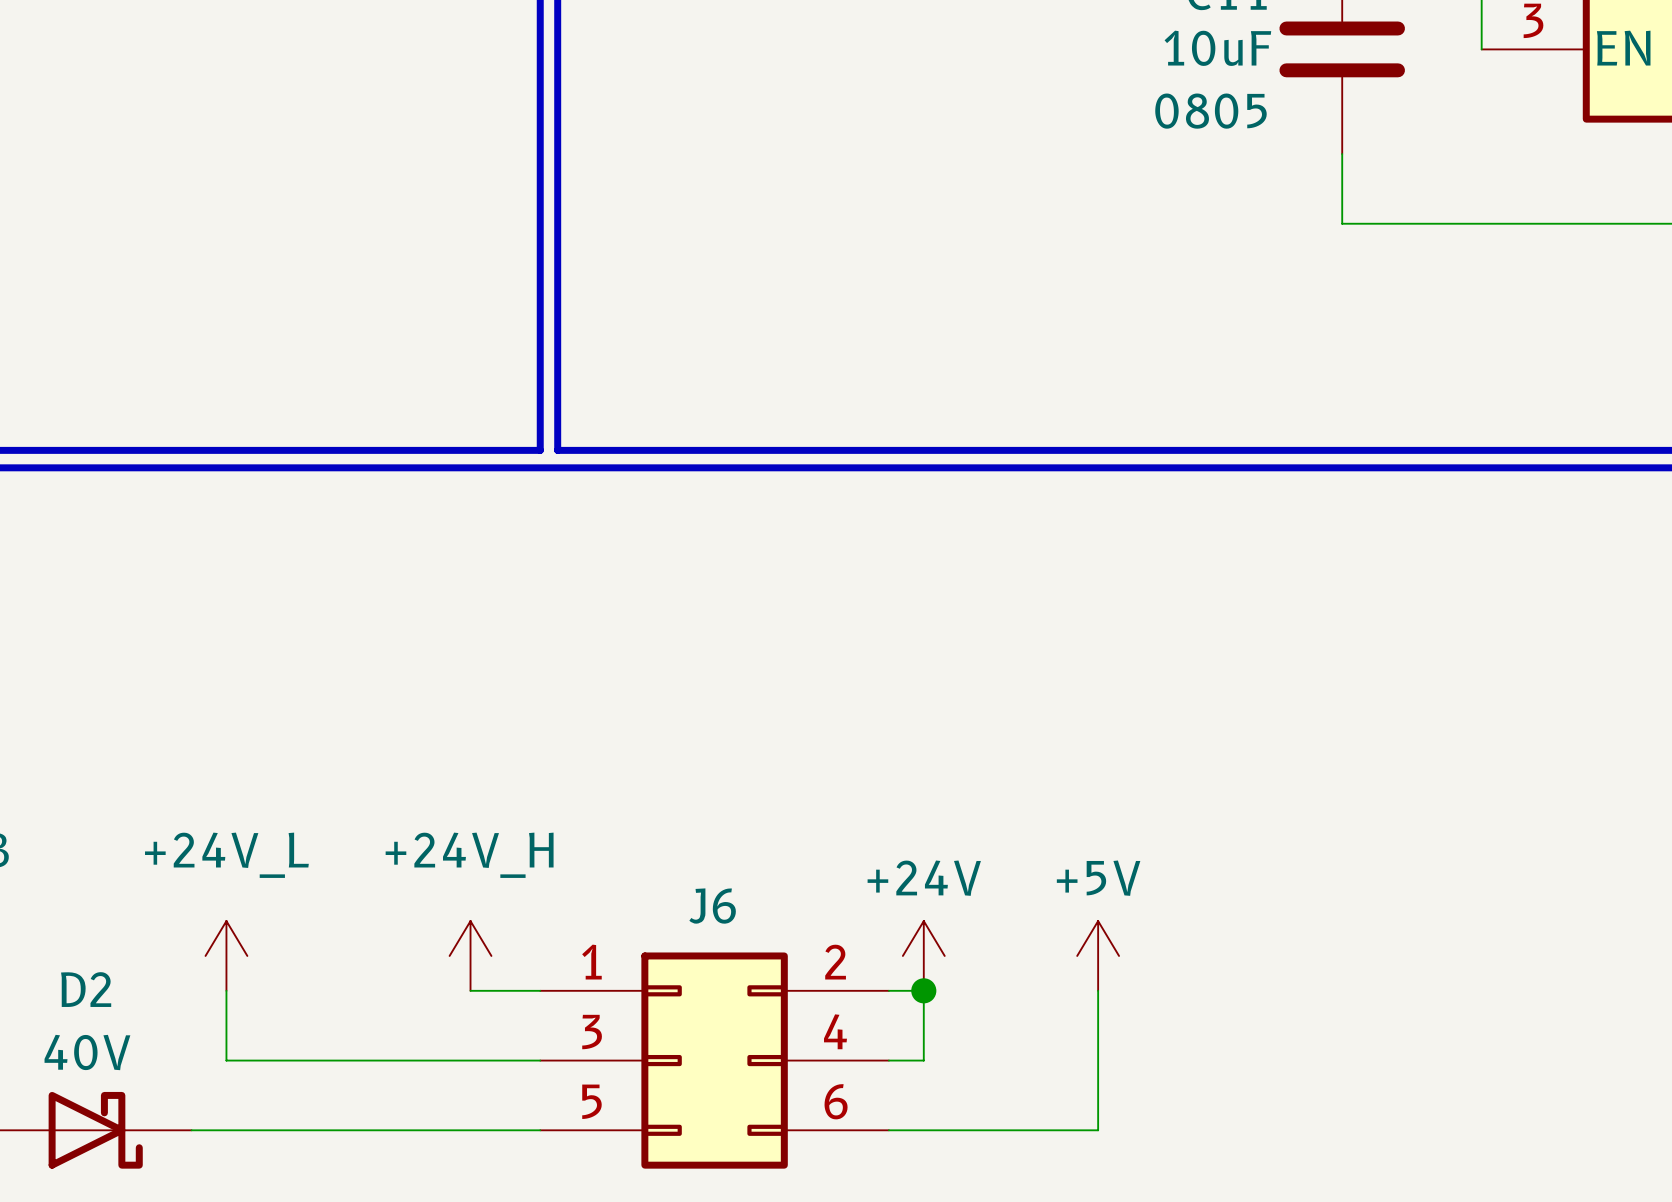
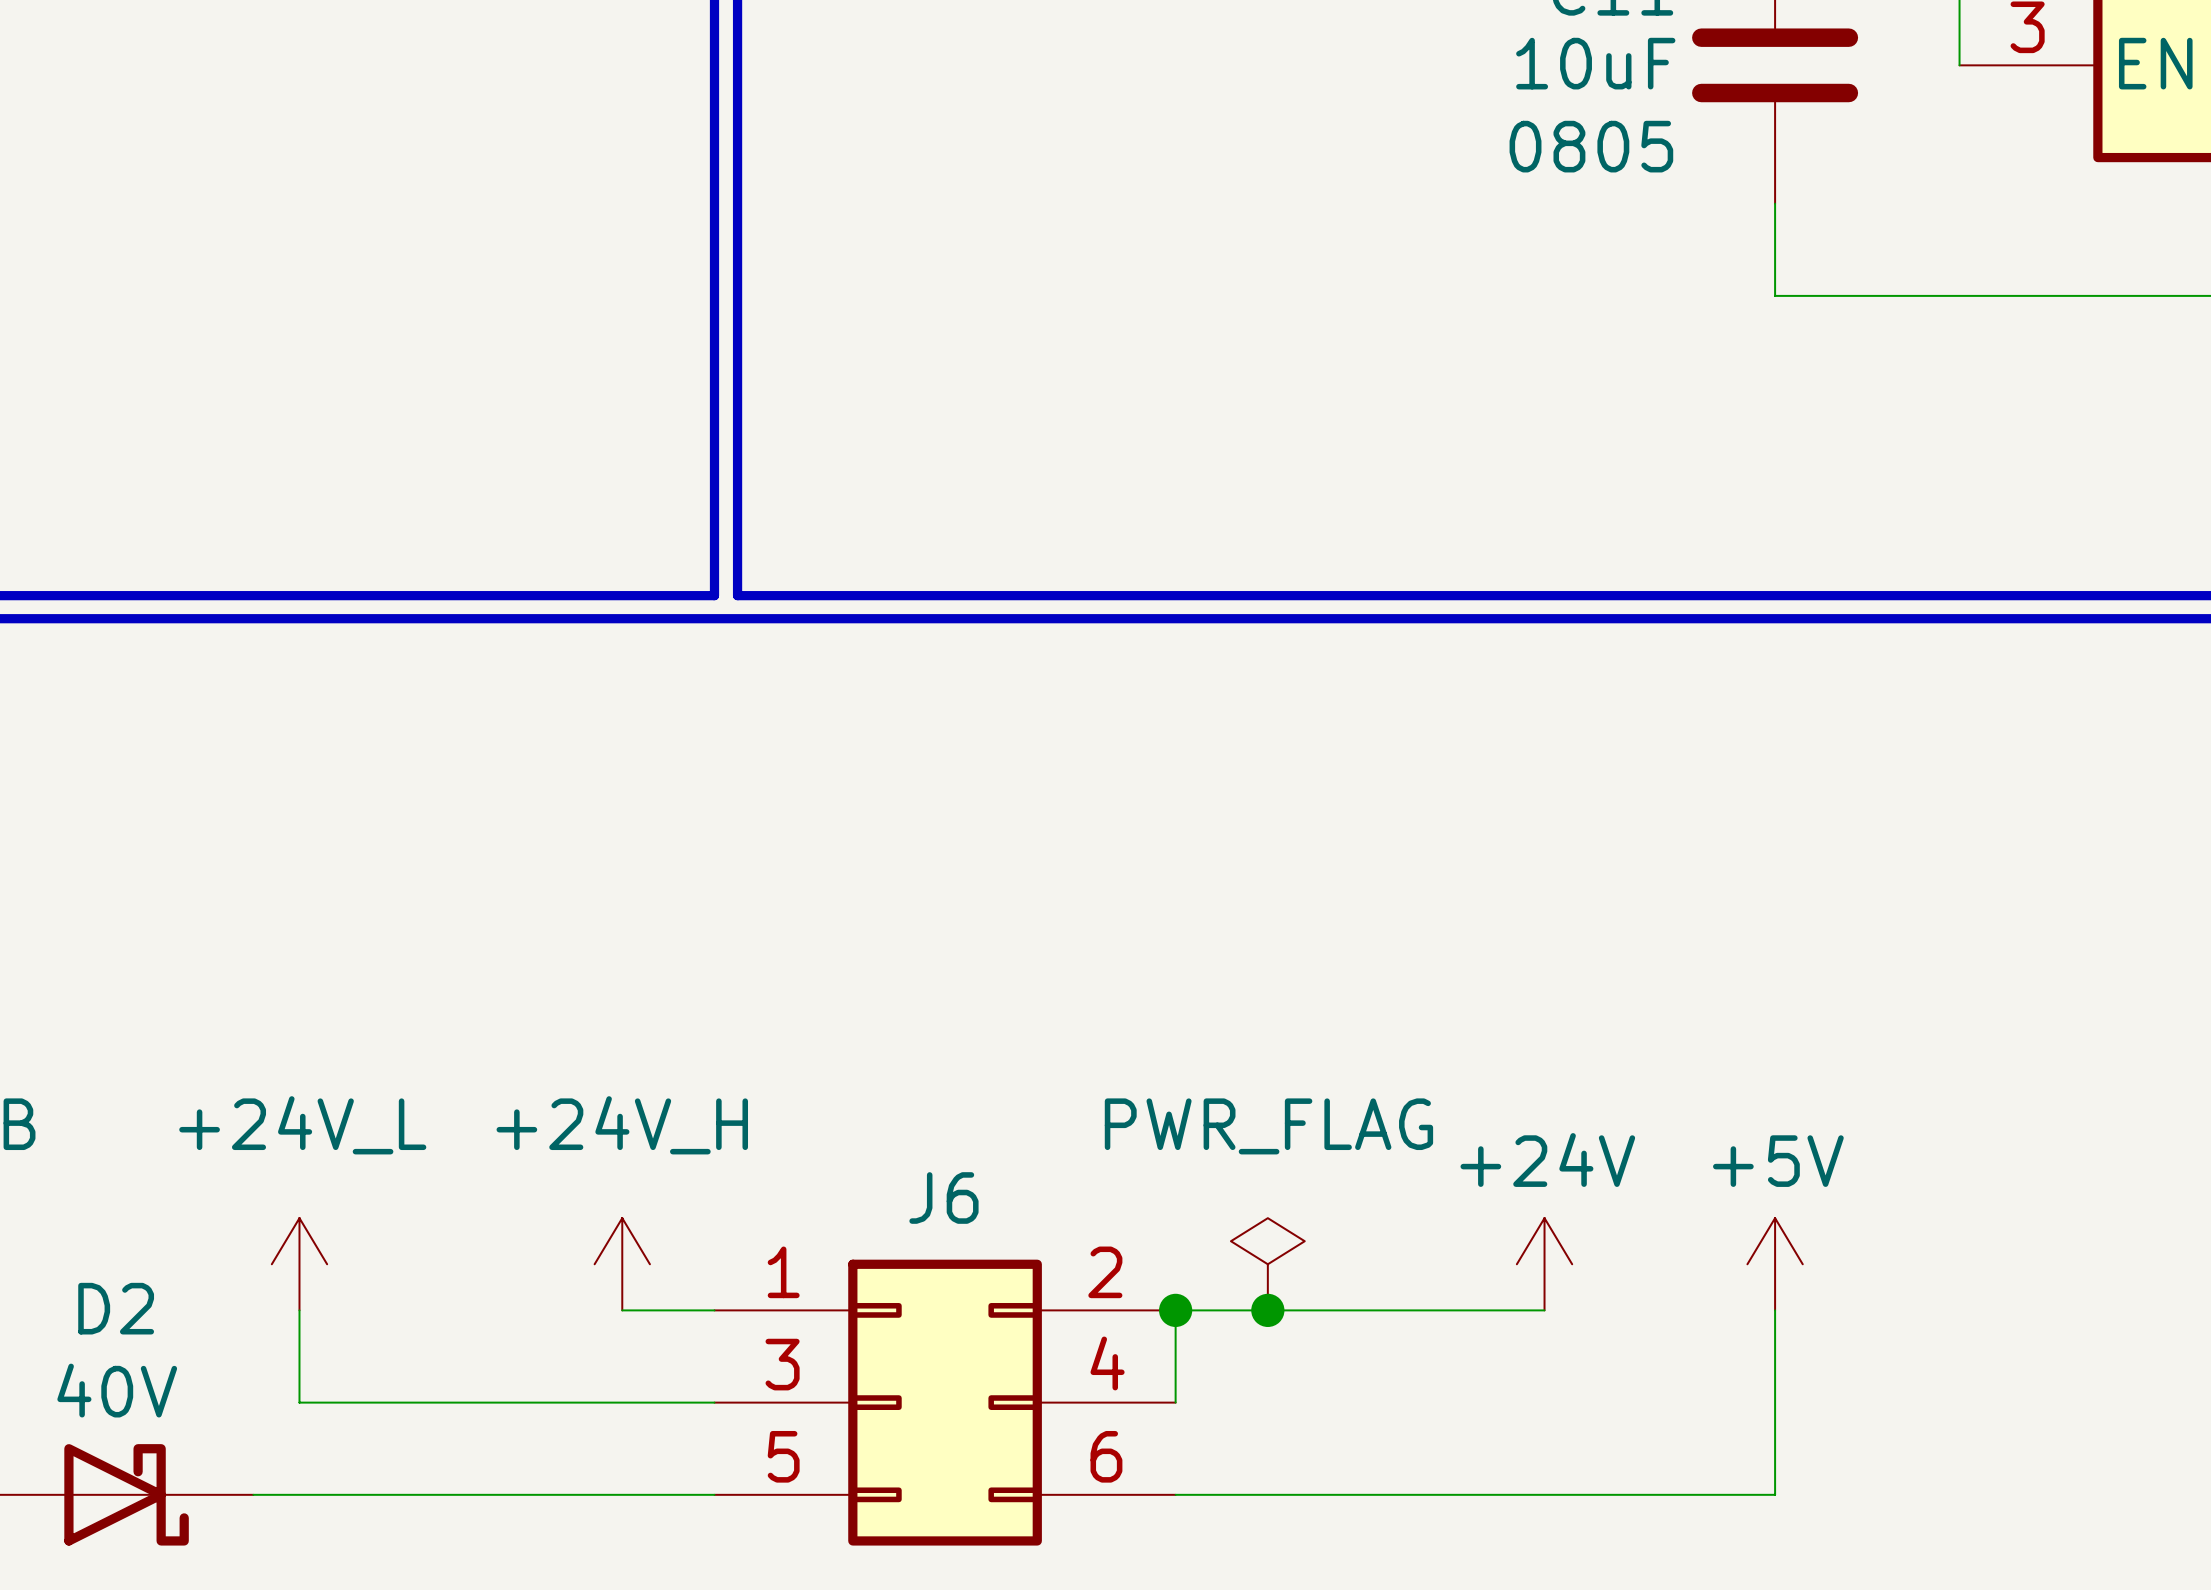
power symbol position: +24V (923, 955) -> +24V (1544, 1264)
power symbol: none -> PWR_FLAG (1267, 1264)
power symbol position: +5V (1098, 955) -> +5V (1775, 1264)
junction: none -> (1175, 1310)
wire: (923, 990) (923, 1060) (888, 1060) -> (1175, 1310) (1175, 1402)
wire: none -> (1221, 1310) (1544, 1310)
junction: (923, 990) -> none
junction: none -> (1267, 1310)
wire: (1098, 990) (1098, 1130) -> (1775, 1310) (1775, 1494) (1452, 1494)

